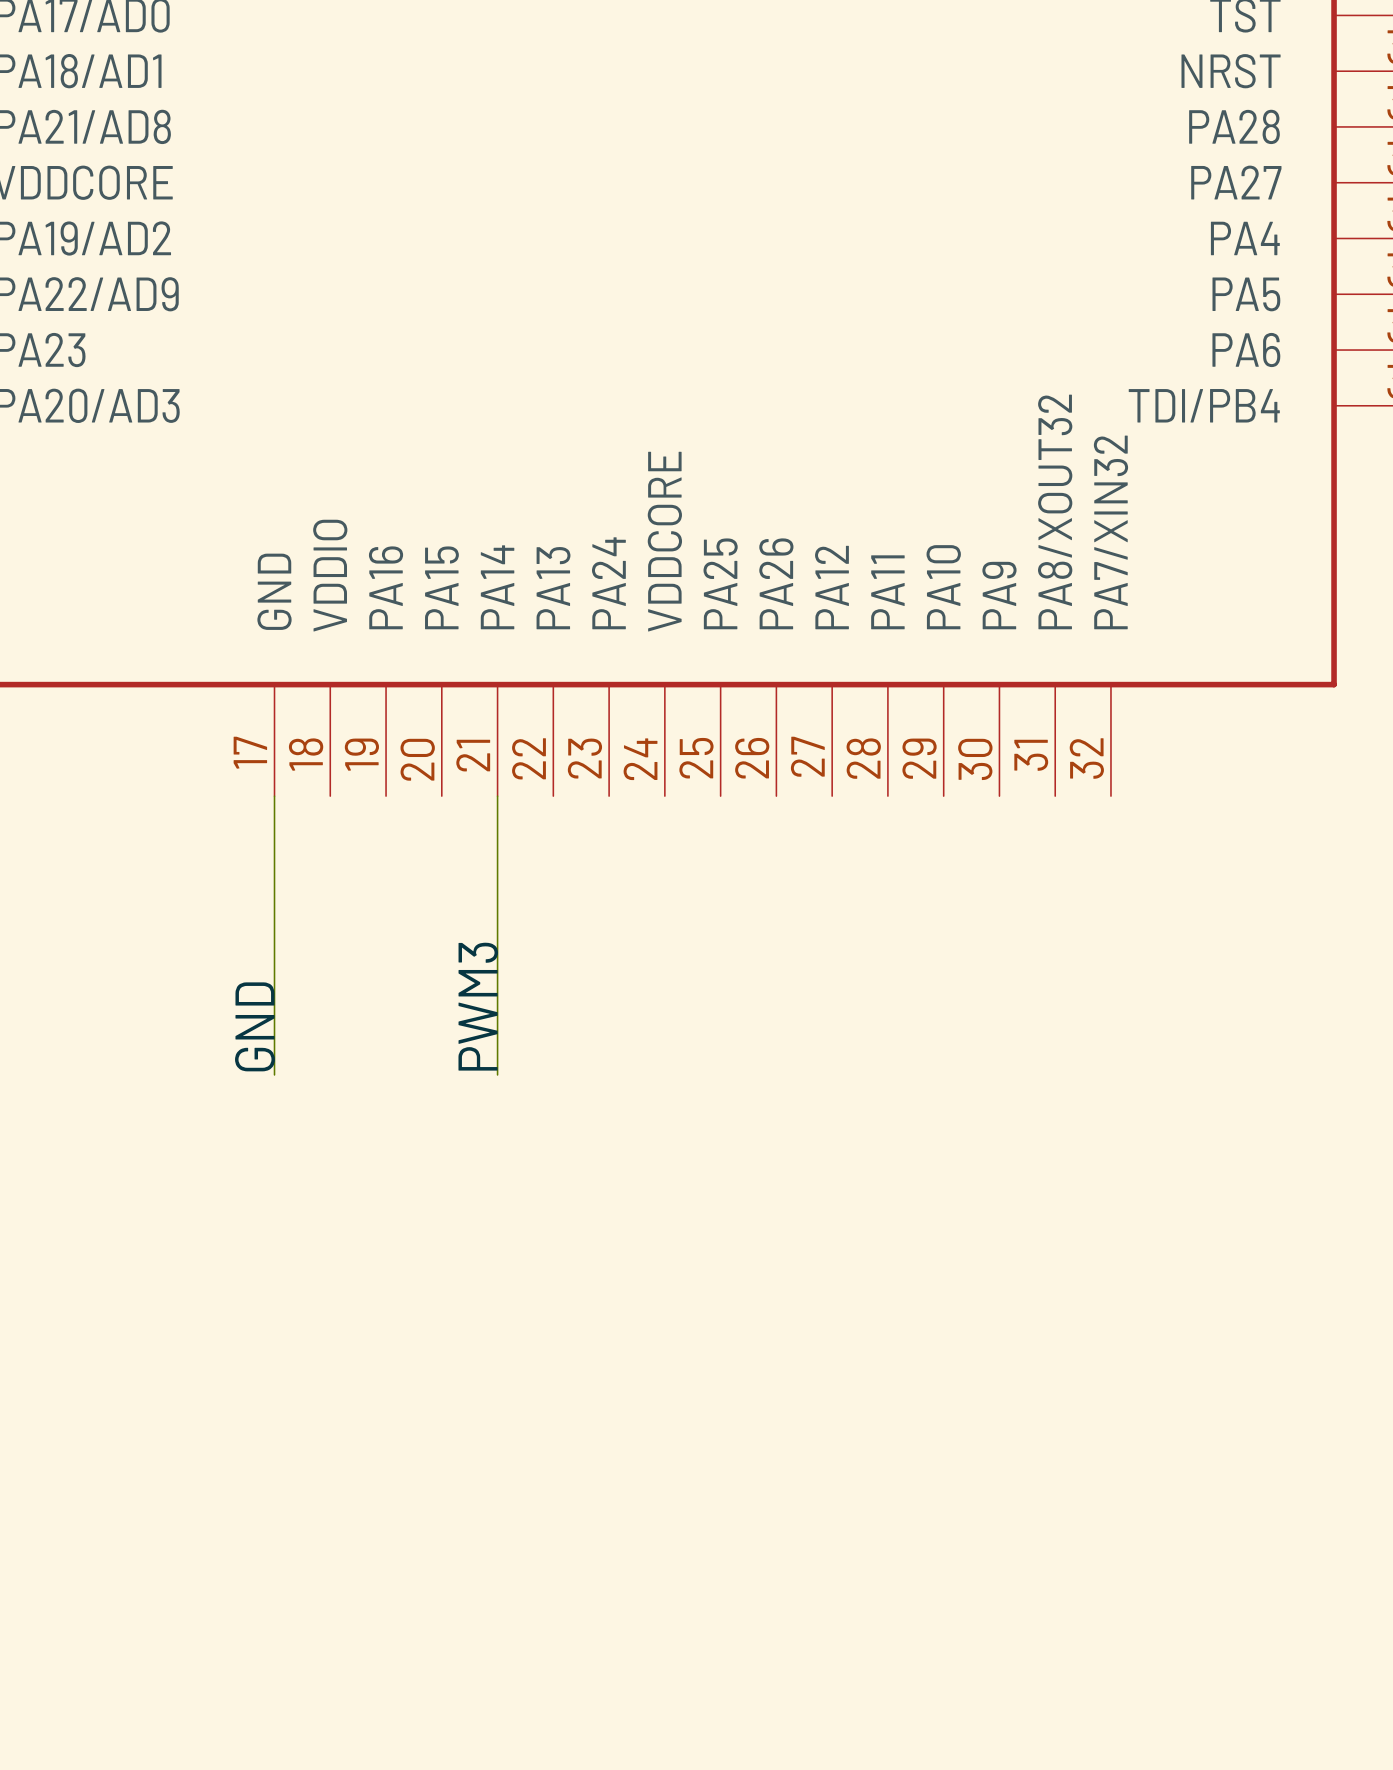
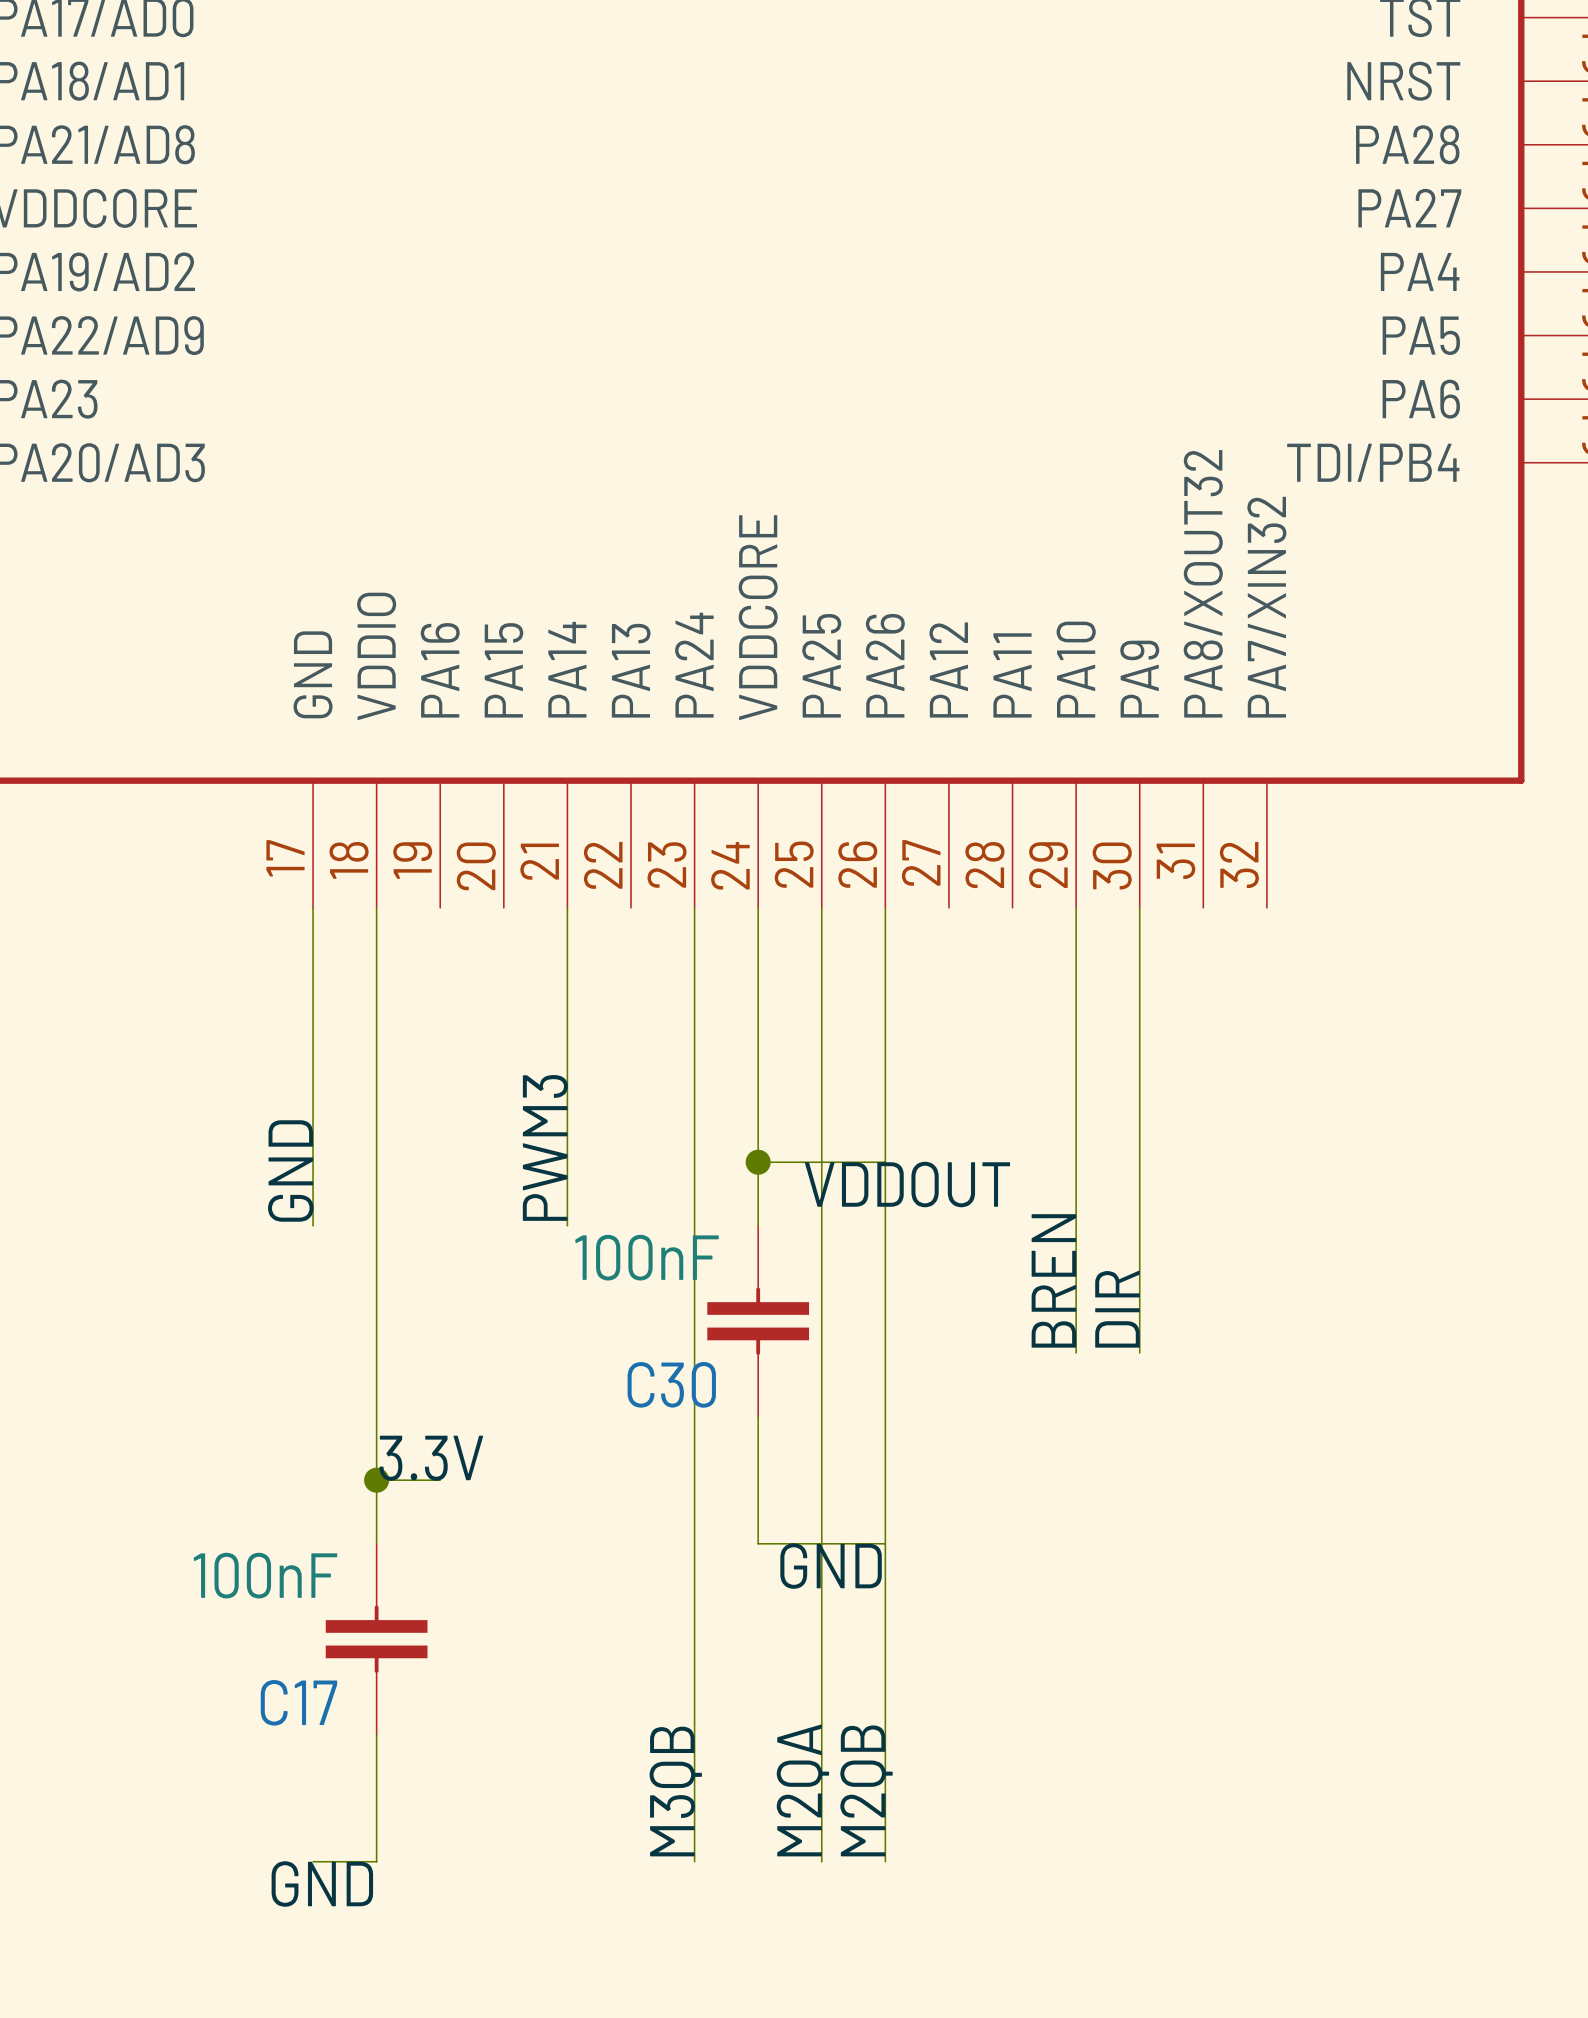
wire: none -> (376, 907) (376, 1543)
wire: none -> (694, 907) (694, 1861)
wire: none -> (758, 907) (758, 1225)
wire: none -> (821, 907) (821, 1861)
wire: none -> (885, 907) (885, 1861)
wire: none -> (1076, 907) (1076, 1353)
wire: none -> (1139, 907) (1139, 1353)
wire: none -> (758, 1162) (885, 1162)
junction: none -> (758, 1162)
label: none -> VDDOUT (907, 1184)
label: none -> BREN (1053, 1280)
label: none -> DIR (1117, 1309)
C30: none -> 100nF (758, 1321)
wire: none -> (758, 1416) (758, 1543) (885, 1543)
label: none -> 3.3V (431, 1458)
wire: none -> (376, 1480) (440, 1480)
junction: none -> (376, 1480)
label: none -> GND (831, 1566)
C17: none -> 100nF (376, 1639)
wire: none -> (376, 1734) (376, 1861) (313, 1861)
label: none -> M2QA (802, 1790)
label: none -> M2QB (866, 1790)
label: none -> M3QB (675, 1791)
label: none -> GND (322, 1884)

